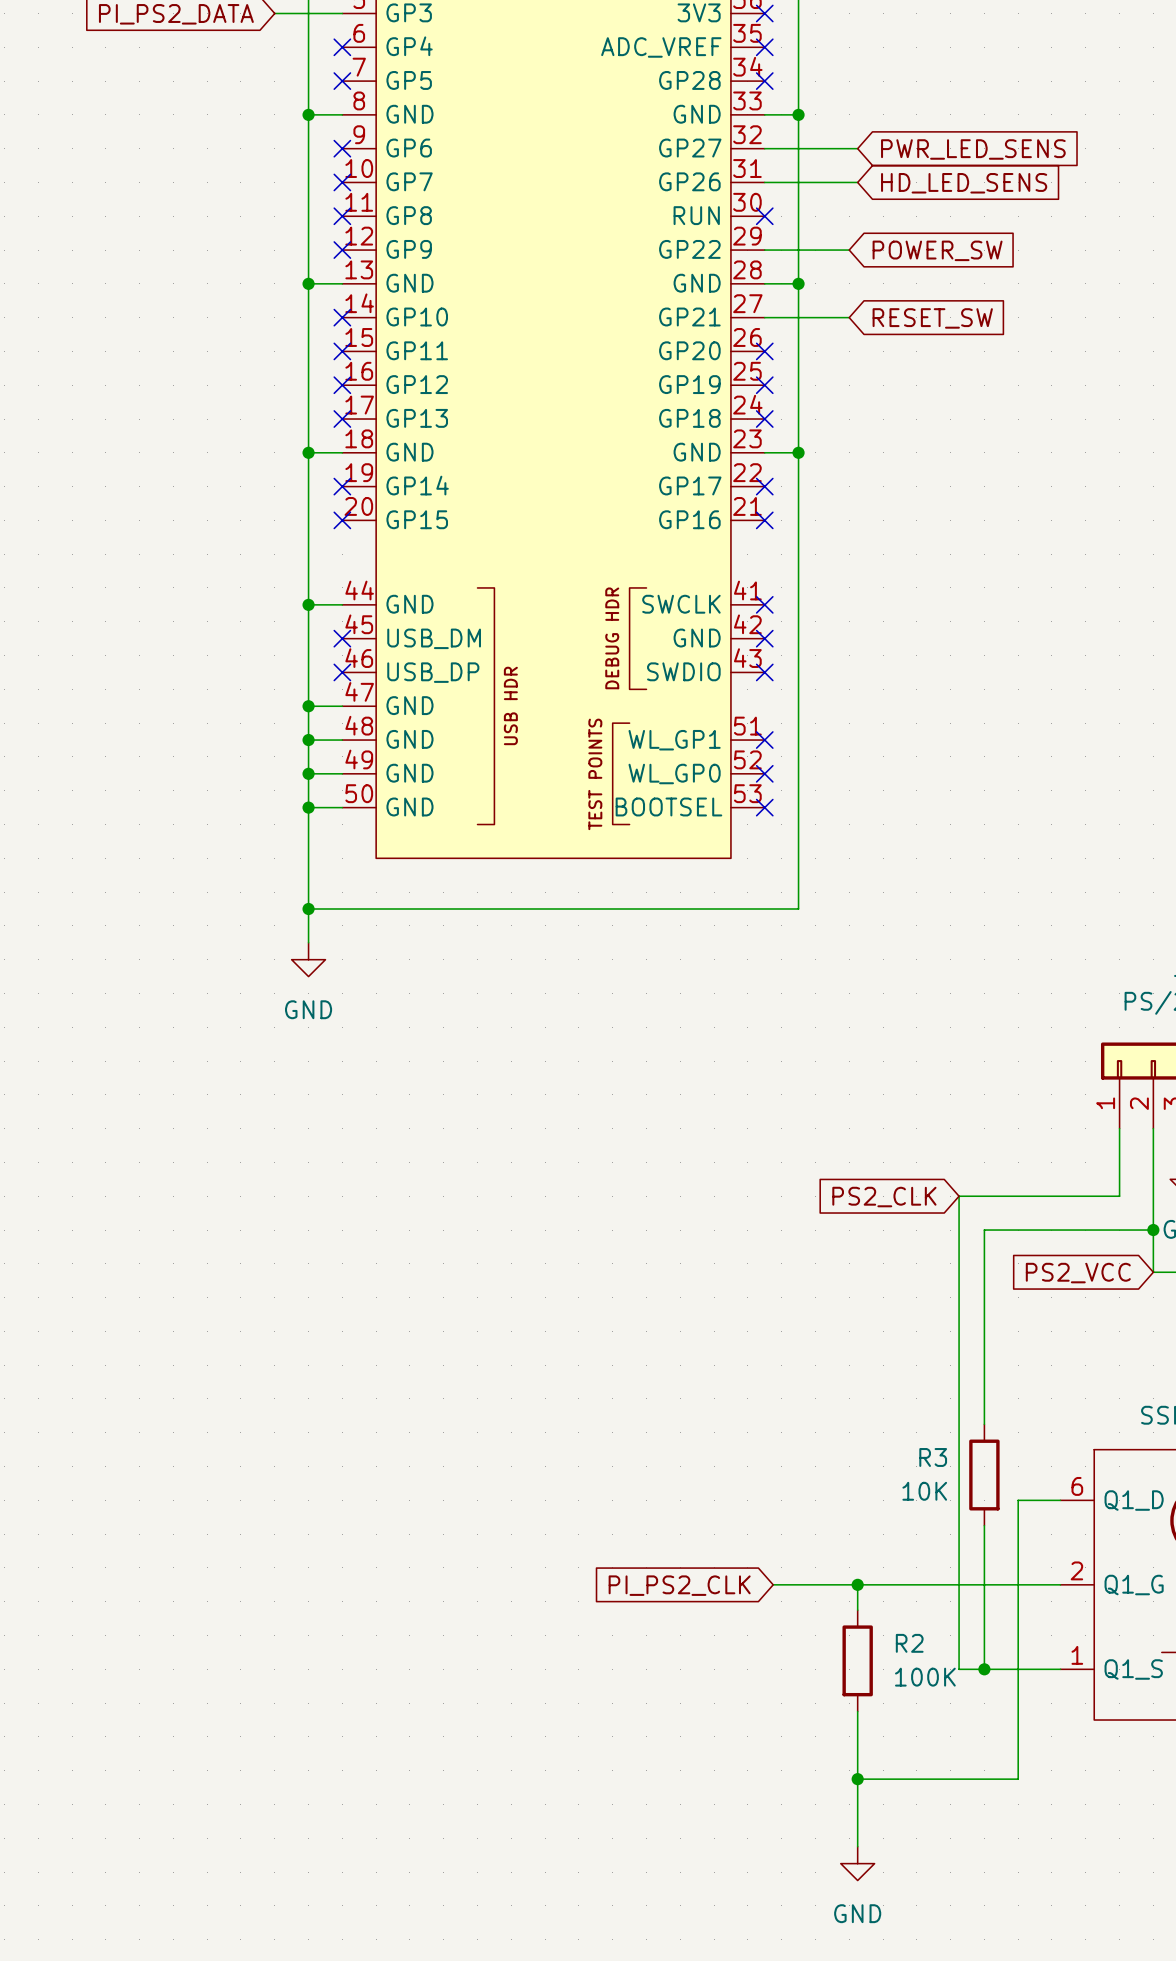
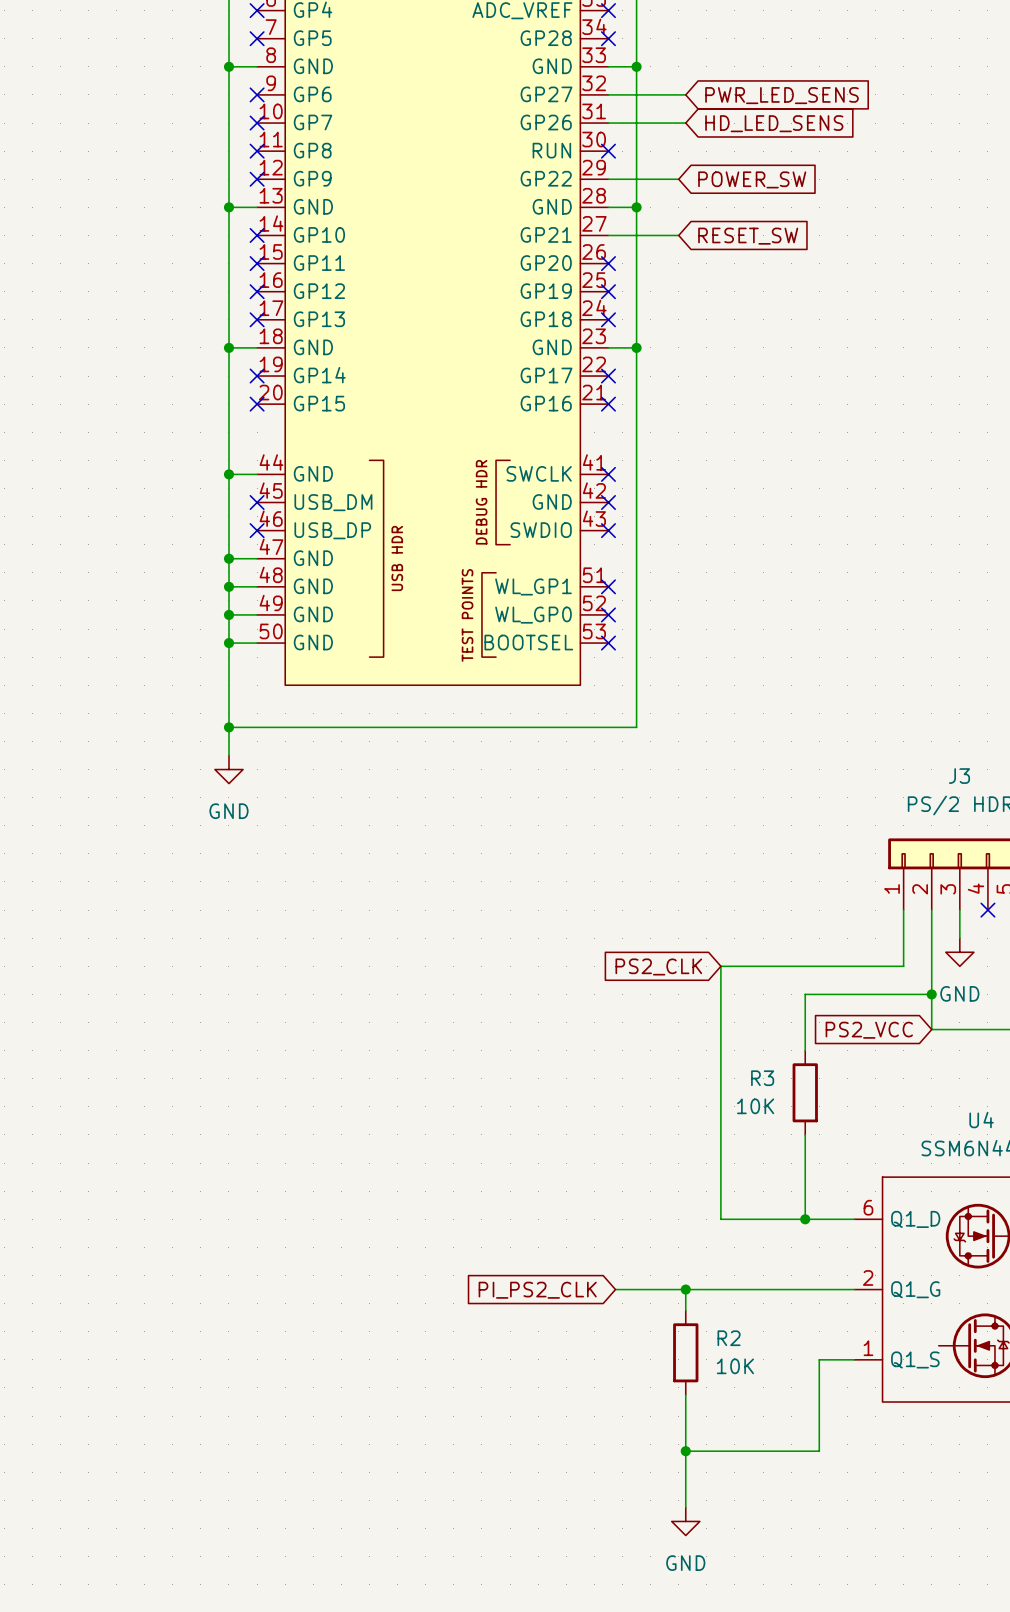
wire: (959, 1196) (959, 1669) (1018, 1669) (1018, 1500) -> (770, 966) (720, 966) (720, 1219) (819, 1219)
global label position: PS2_CLK (884, 1197) -> PS2_CLK (658, 966)
wire: (1001, 1230) (984, 1230) (984, 1424) -> (805, 994) (805, 1050)
wire: none -> (805, 1134) (805, 1219)
R3 position: (984, 1475) -> (805, 1092)
junction: none -> (805, 1219)
wire: (984, 1525) (984, 1669) -> none
junction: (984, 1669) -> none
R2 value: 100K (925, 1677) -> 10K (735, 1366)

